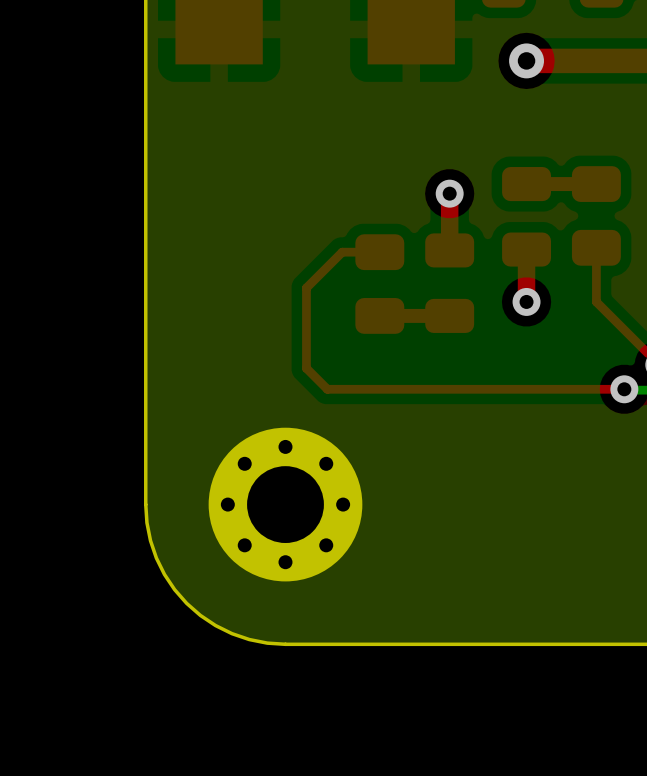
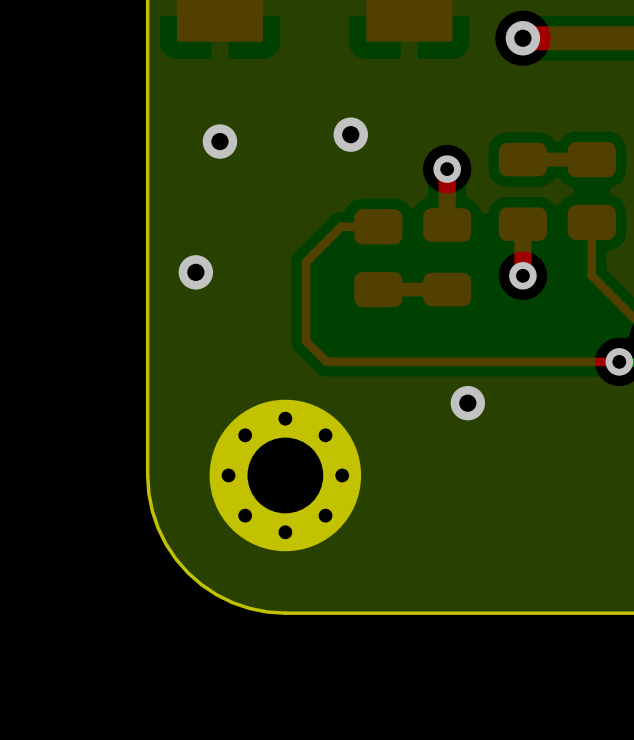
via: none -> (350, 134)
via: none -> (219, 141)
via: none -> (195, 272)
via: none -> (467, 403)

